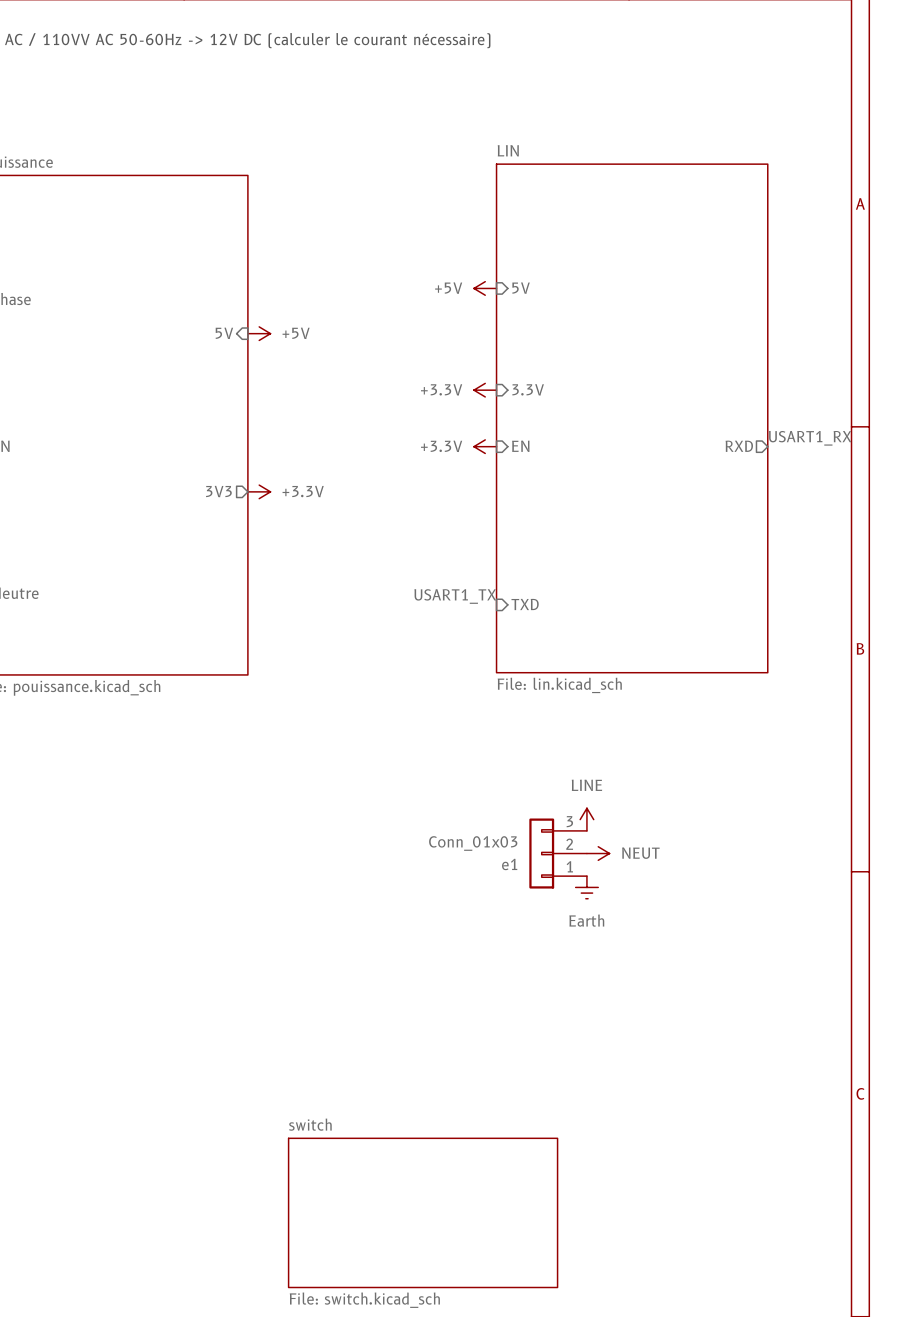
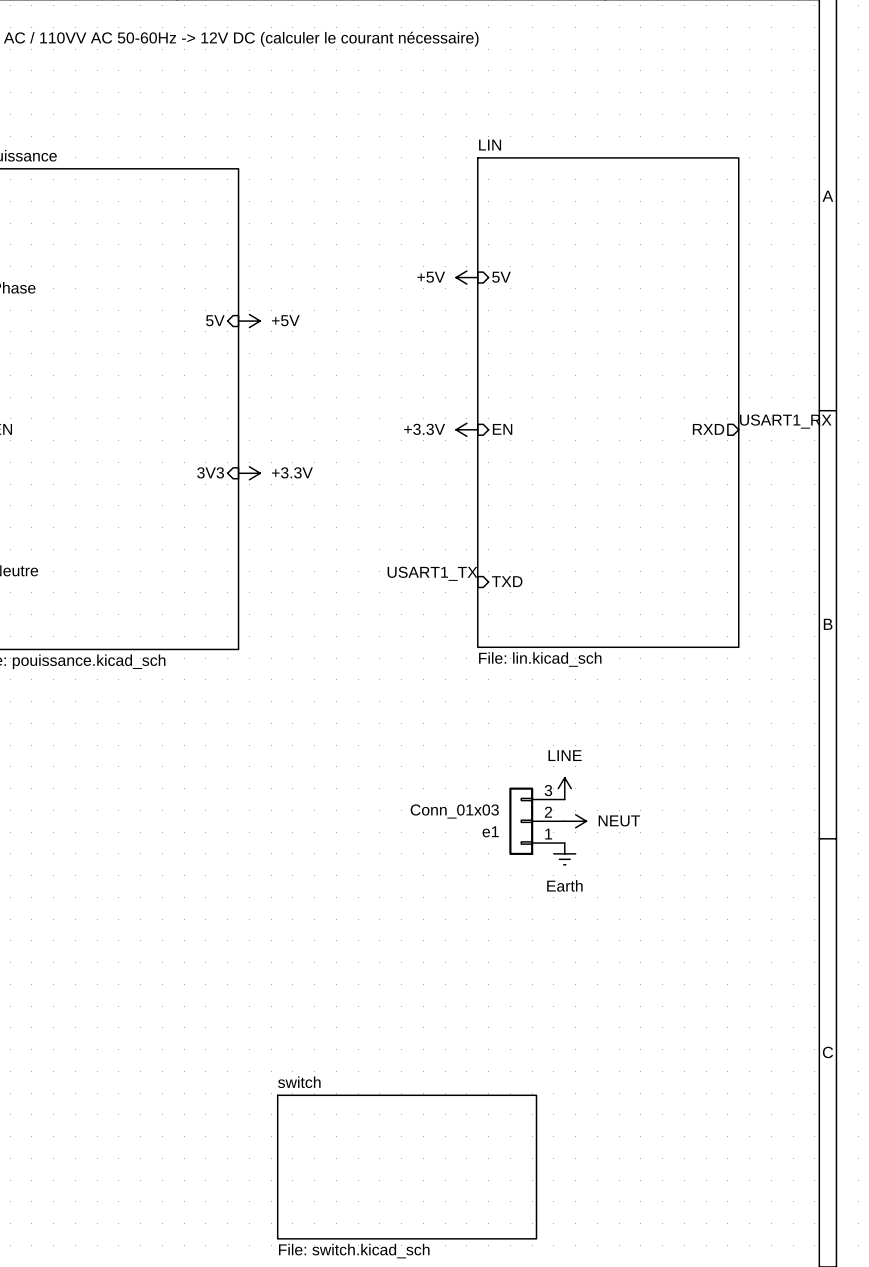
sheet pin: 3.3V (528, 389) -> none
power symbol: +3.3V (485, 390) -> none
sheet pin shape: output (218, 491) -> input (210, 472)

